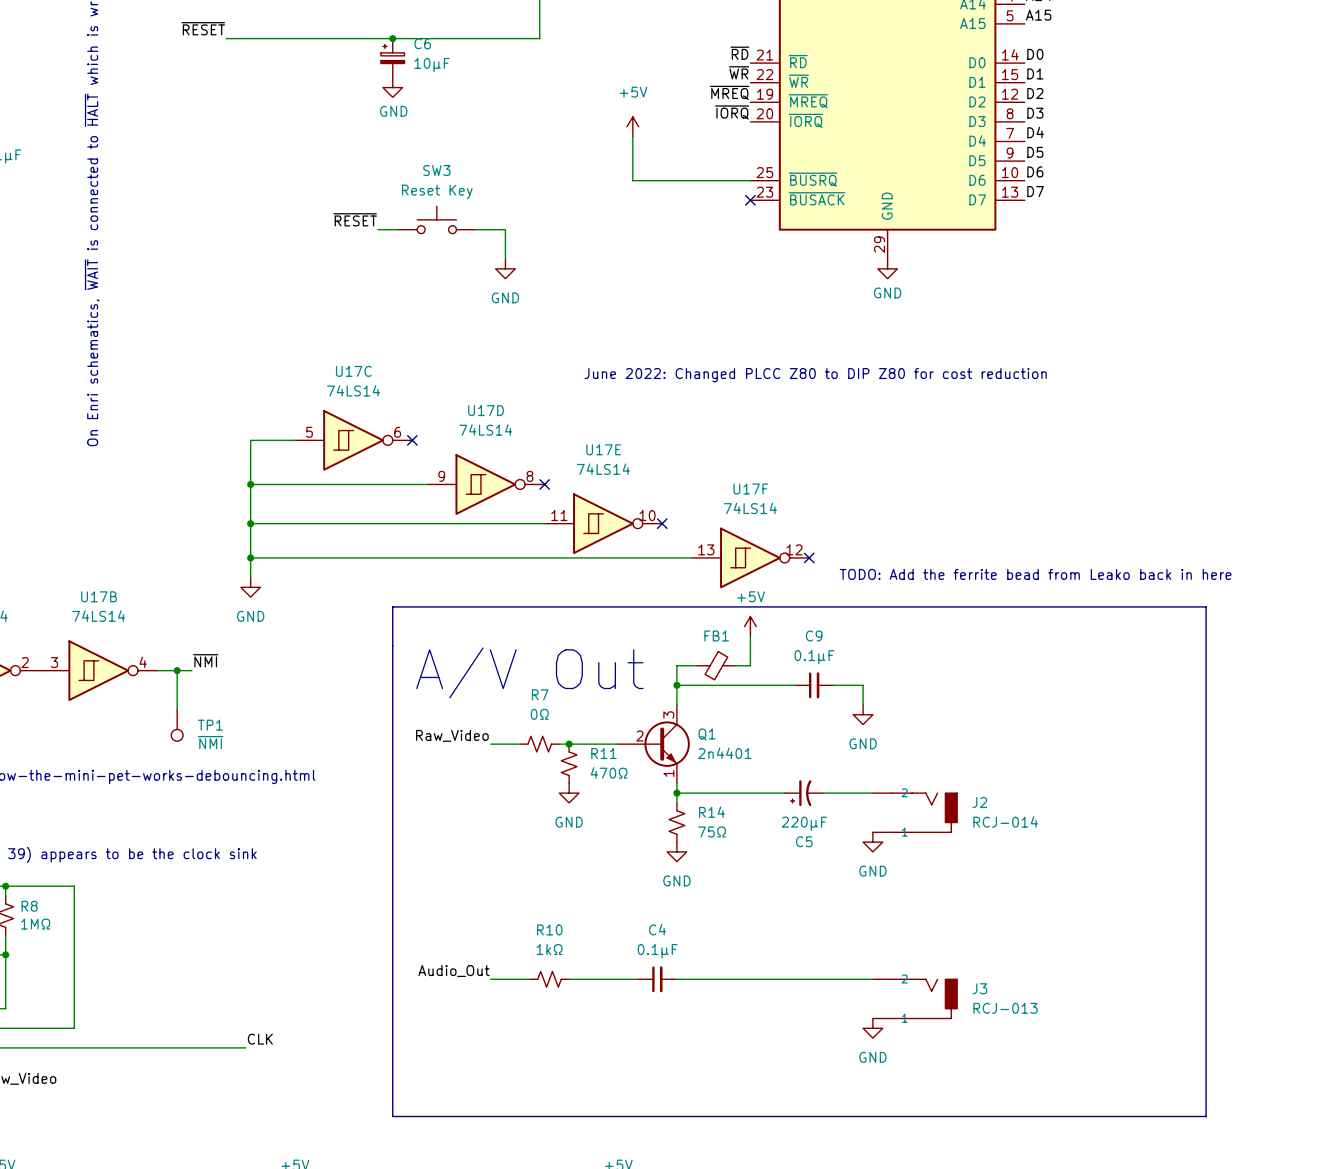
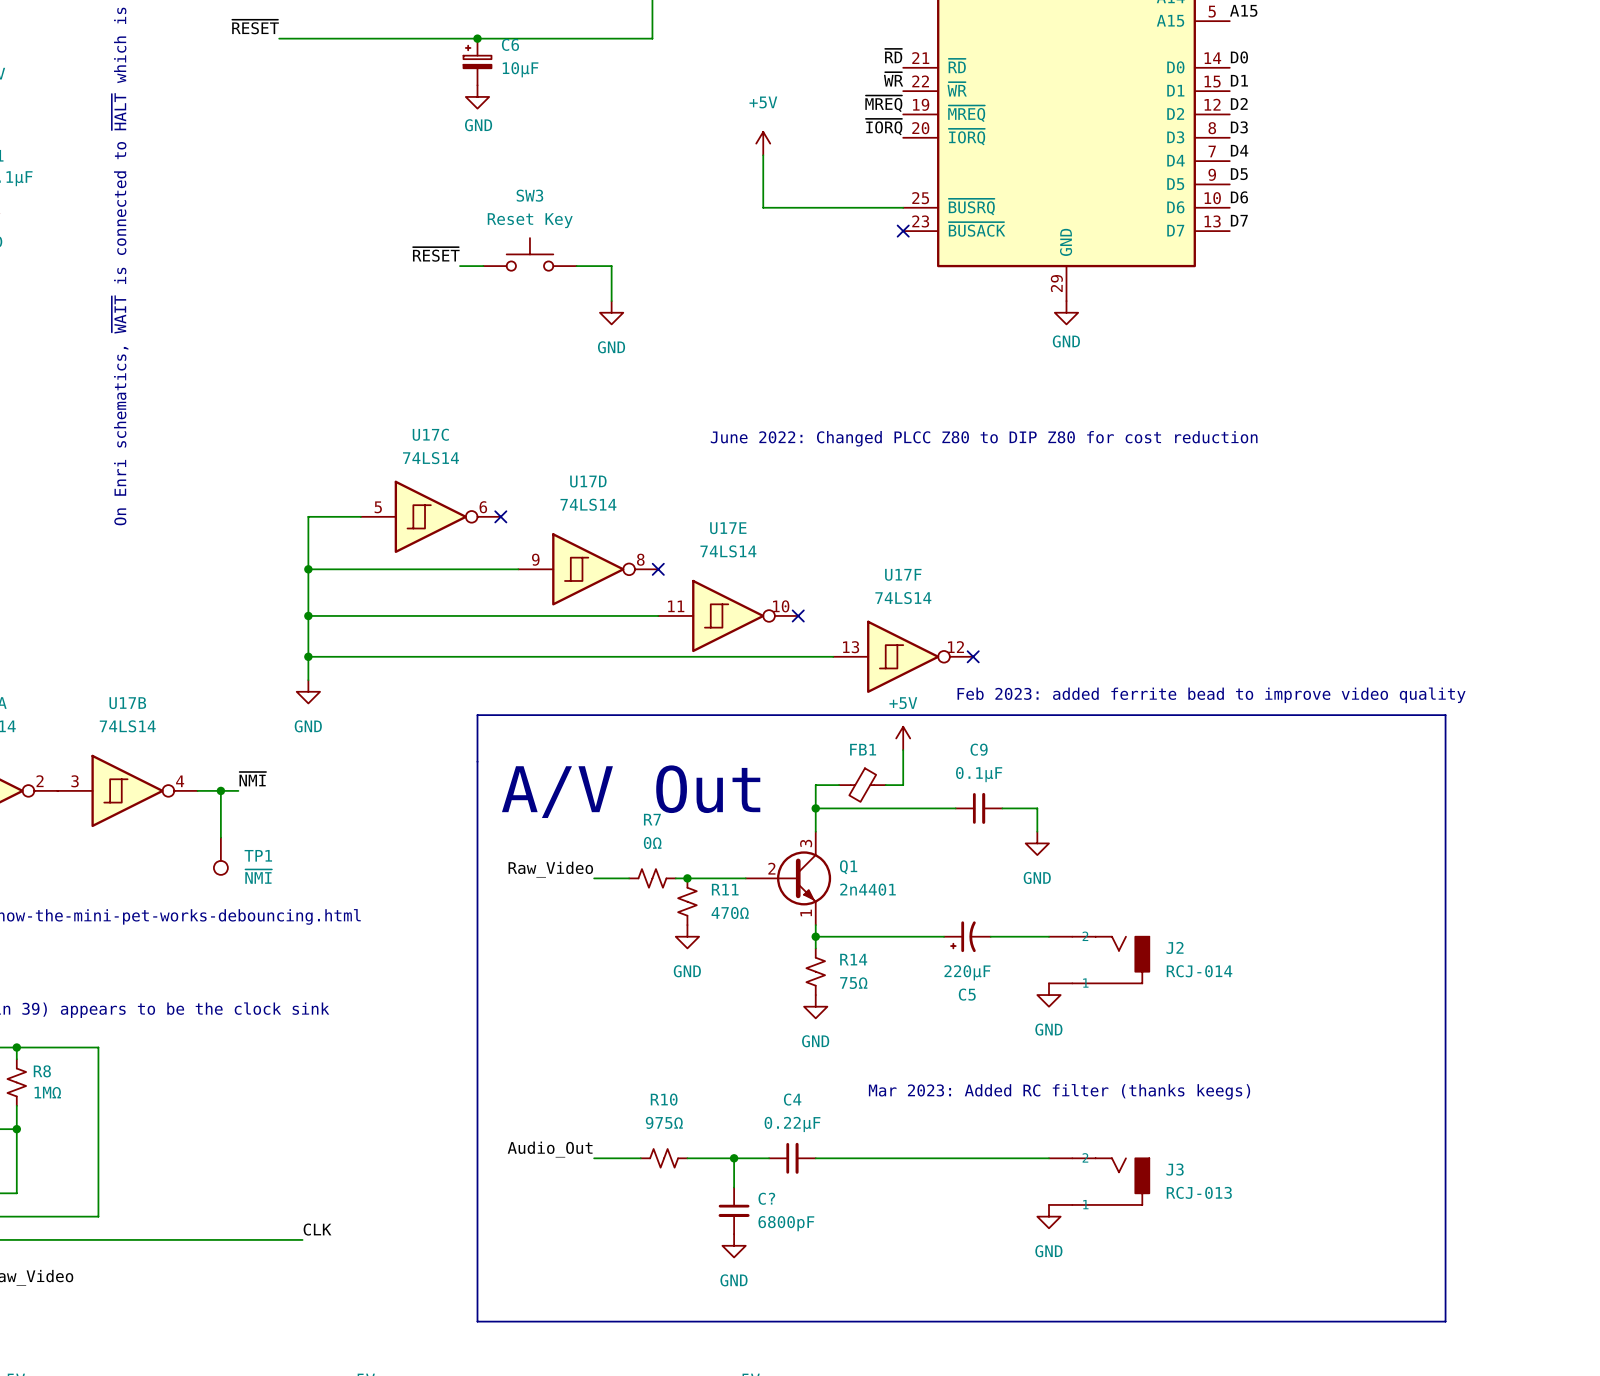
text: TODO: Add the ferrite bead from Leako back in here (1035, 574) -> none
text: none -> Feb 2023: added ferrite bead to improve video quality (1211, 695)
text: none -> Mar 2023: Added RC filter (thanks keegs) (1059, 1091)
R10 value: 1kΩ (549, 949) -> 975Ω (664, 1122)
C4 value: 0.1µF (657, 951) -> 0.22µF (792, 1124)
wire: none -> (734, 1158) (734, 1187)
junction: none -> (734, 1158)
C?: none -> 6800pF (734, 1210)
power symbol: none -> GND (734, 1245)

